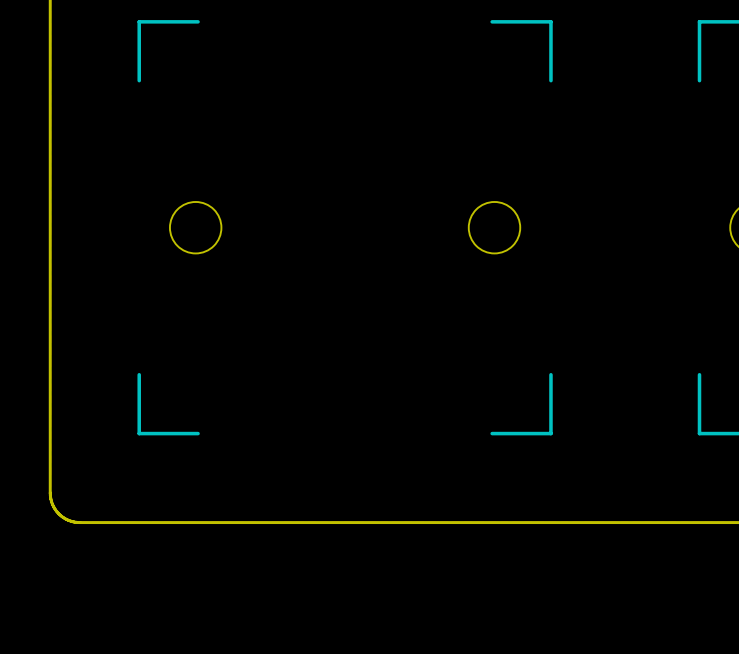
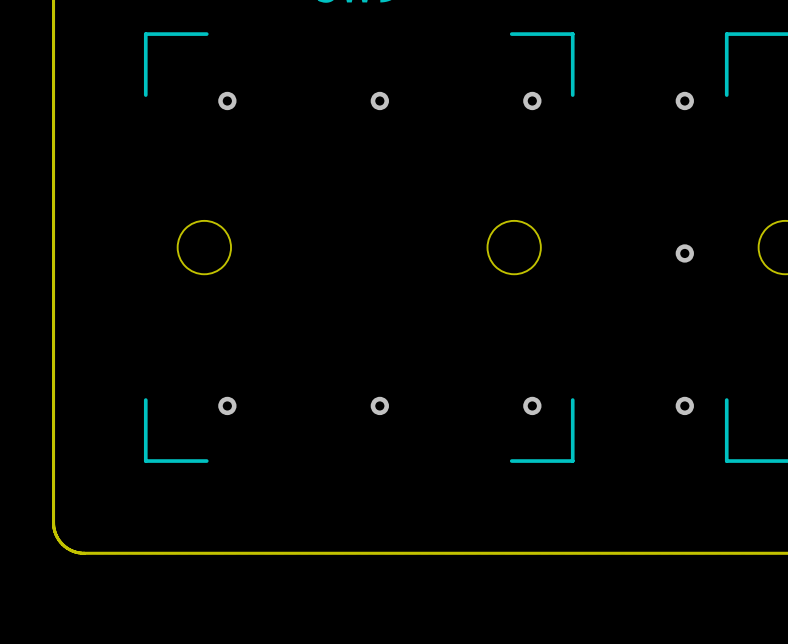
via: none -> (227, 100)
via: none -> (379, 100)
via: none -> (532, 100)
via: none -> (684, 100)
via: none -> (684, 253)
via: none -> (227, 405)
via: none -> (379, 405)
via: none -> (532, 405)
via: none -> (684, 405)

